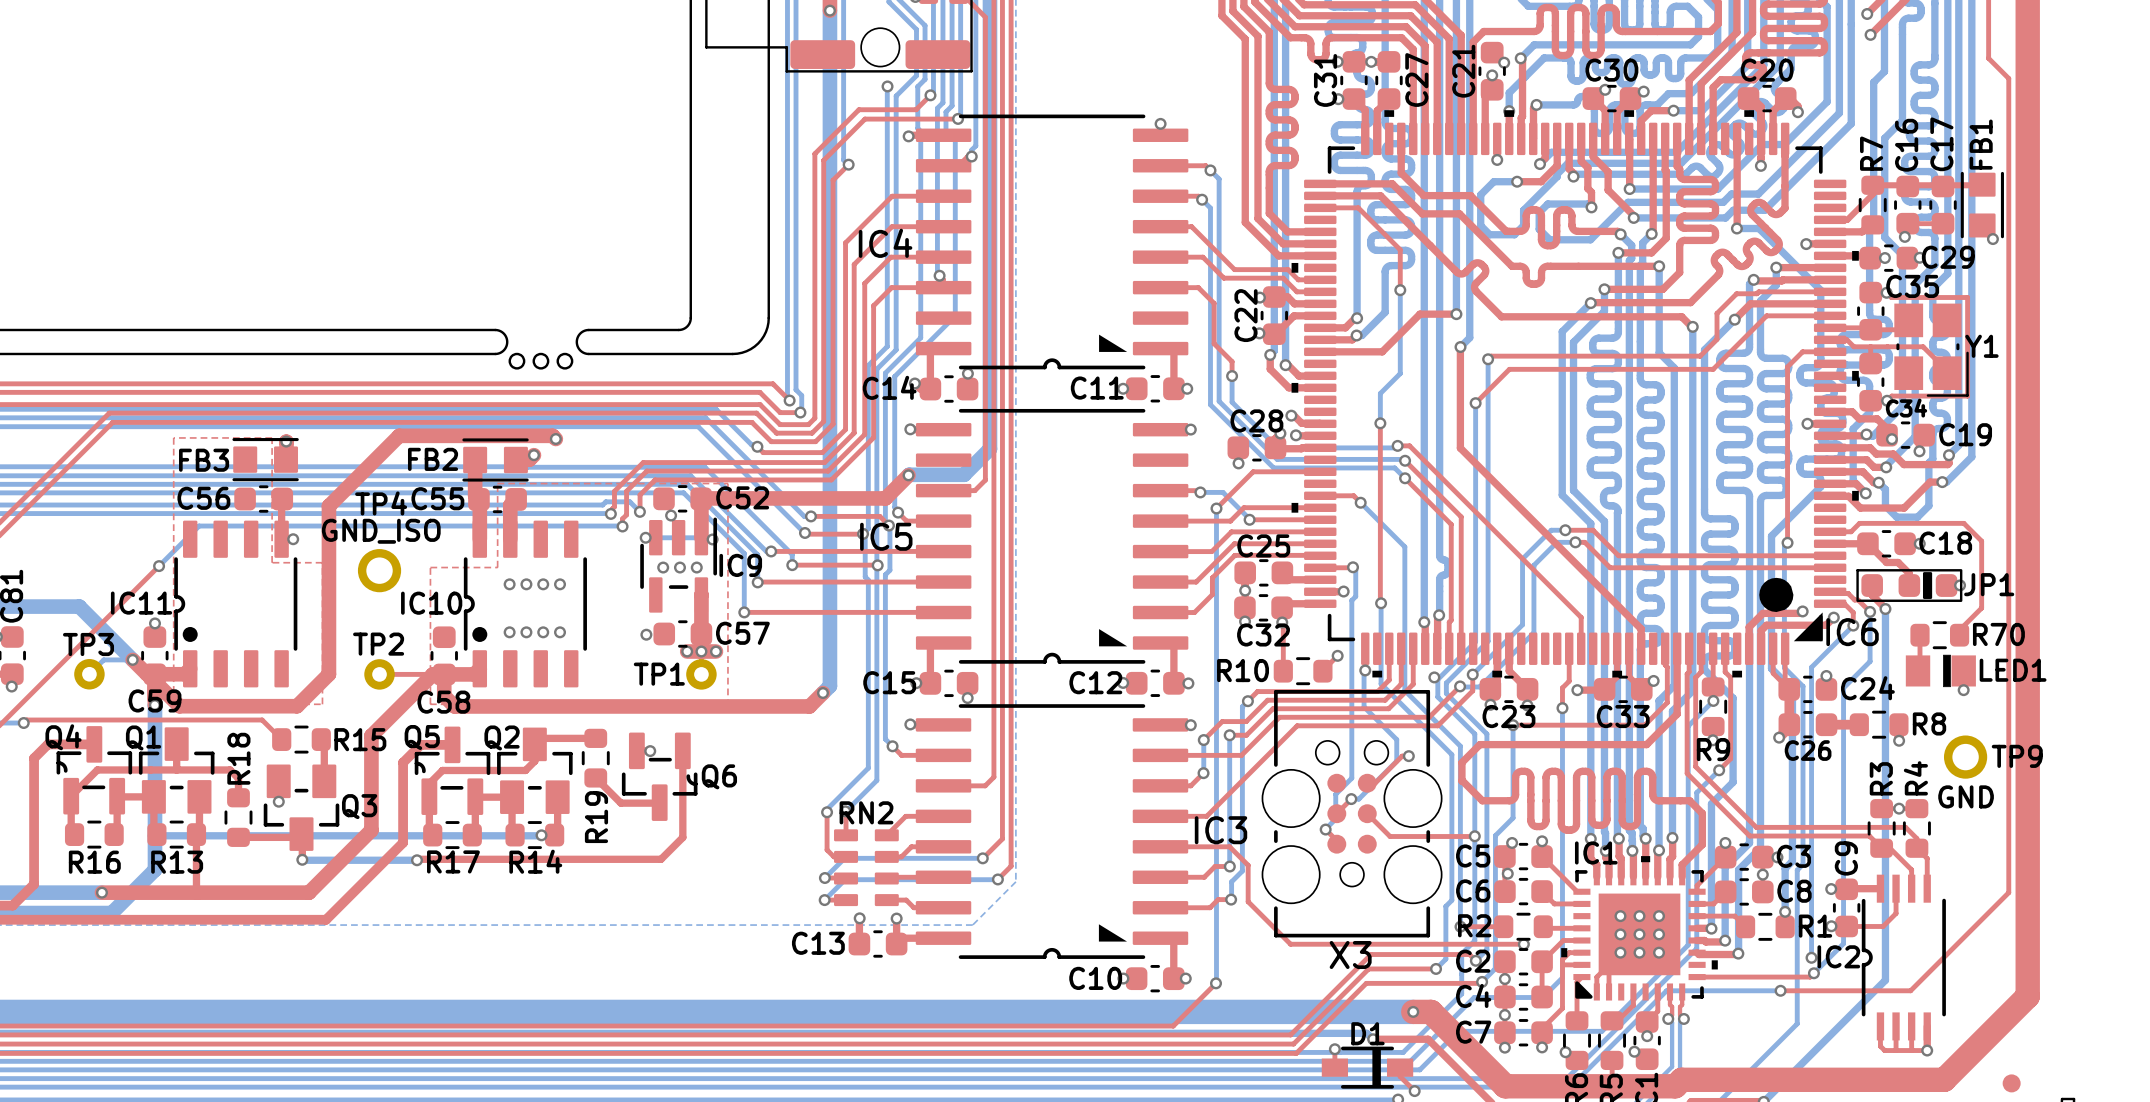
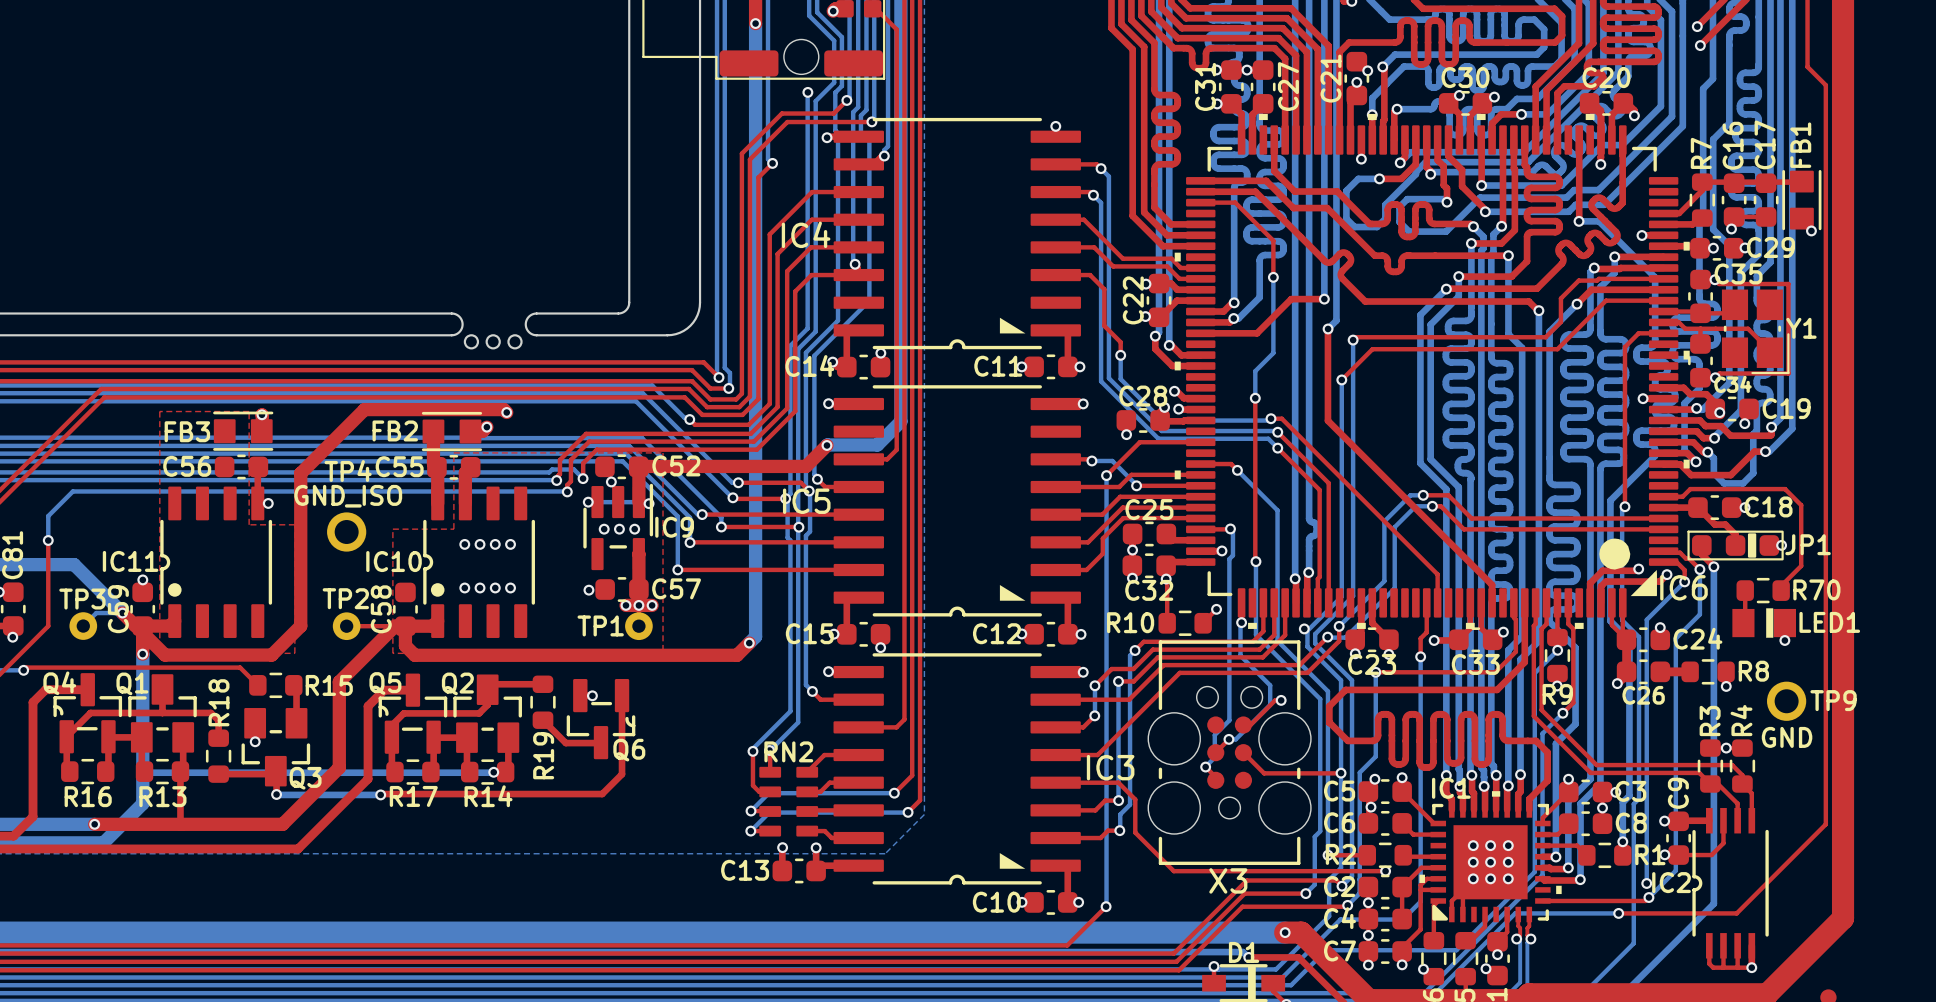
bottom track: (199, 526) (159, 566) -> (182, 491) (72, 491) (48, 516) (48, 540)
top track: (159, 566) (50, 674) -> (48, 540) (48, 626)
via position: (159, 566) -> (48, 540)
C59 name rotation: 0° (154, 700) -> 90° counterclockwise (118, 609)
C58 name rotation: 0° (443, 702) -> 90° counterclockwise (381, 609)
Q6 name position: Q6 (719, 776) -> Q6 (629, 750)
Q3 name position: Q3 (359, 806) -> Q3 (305, 778)

